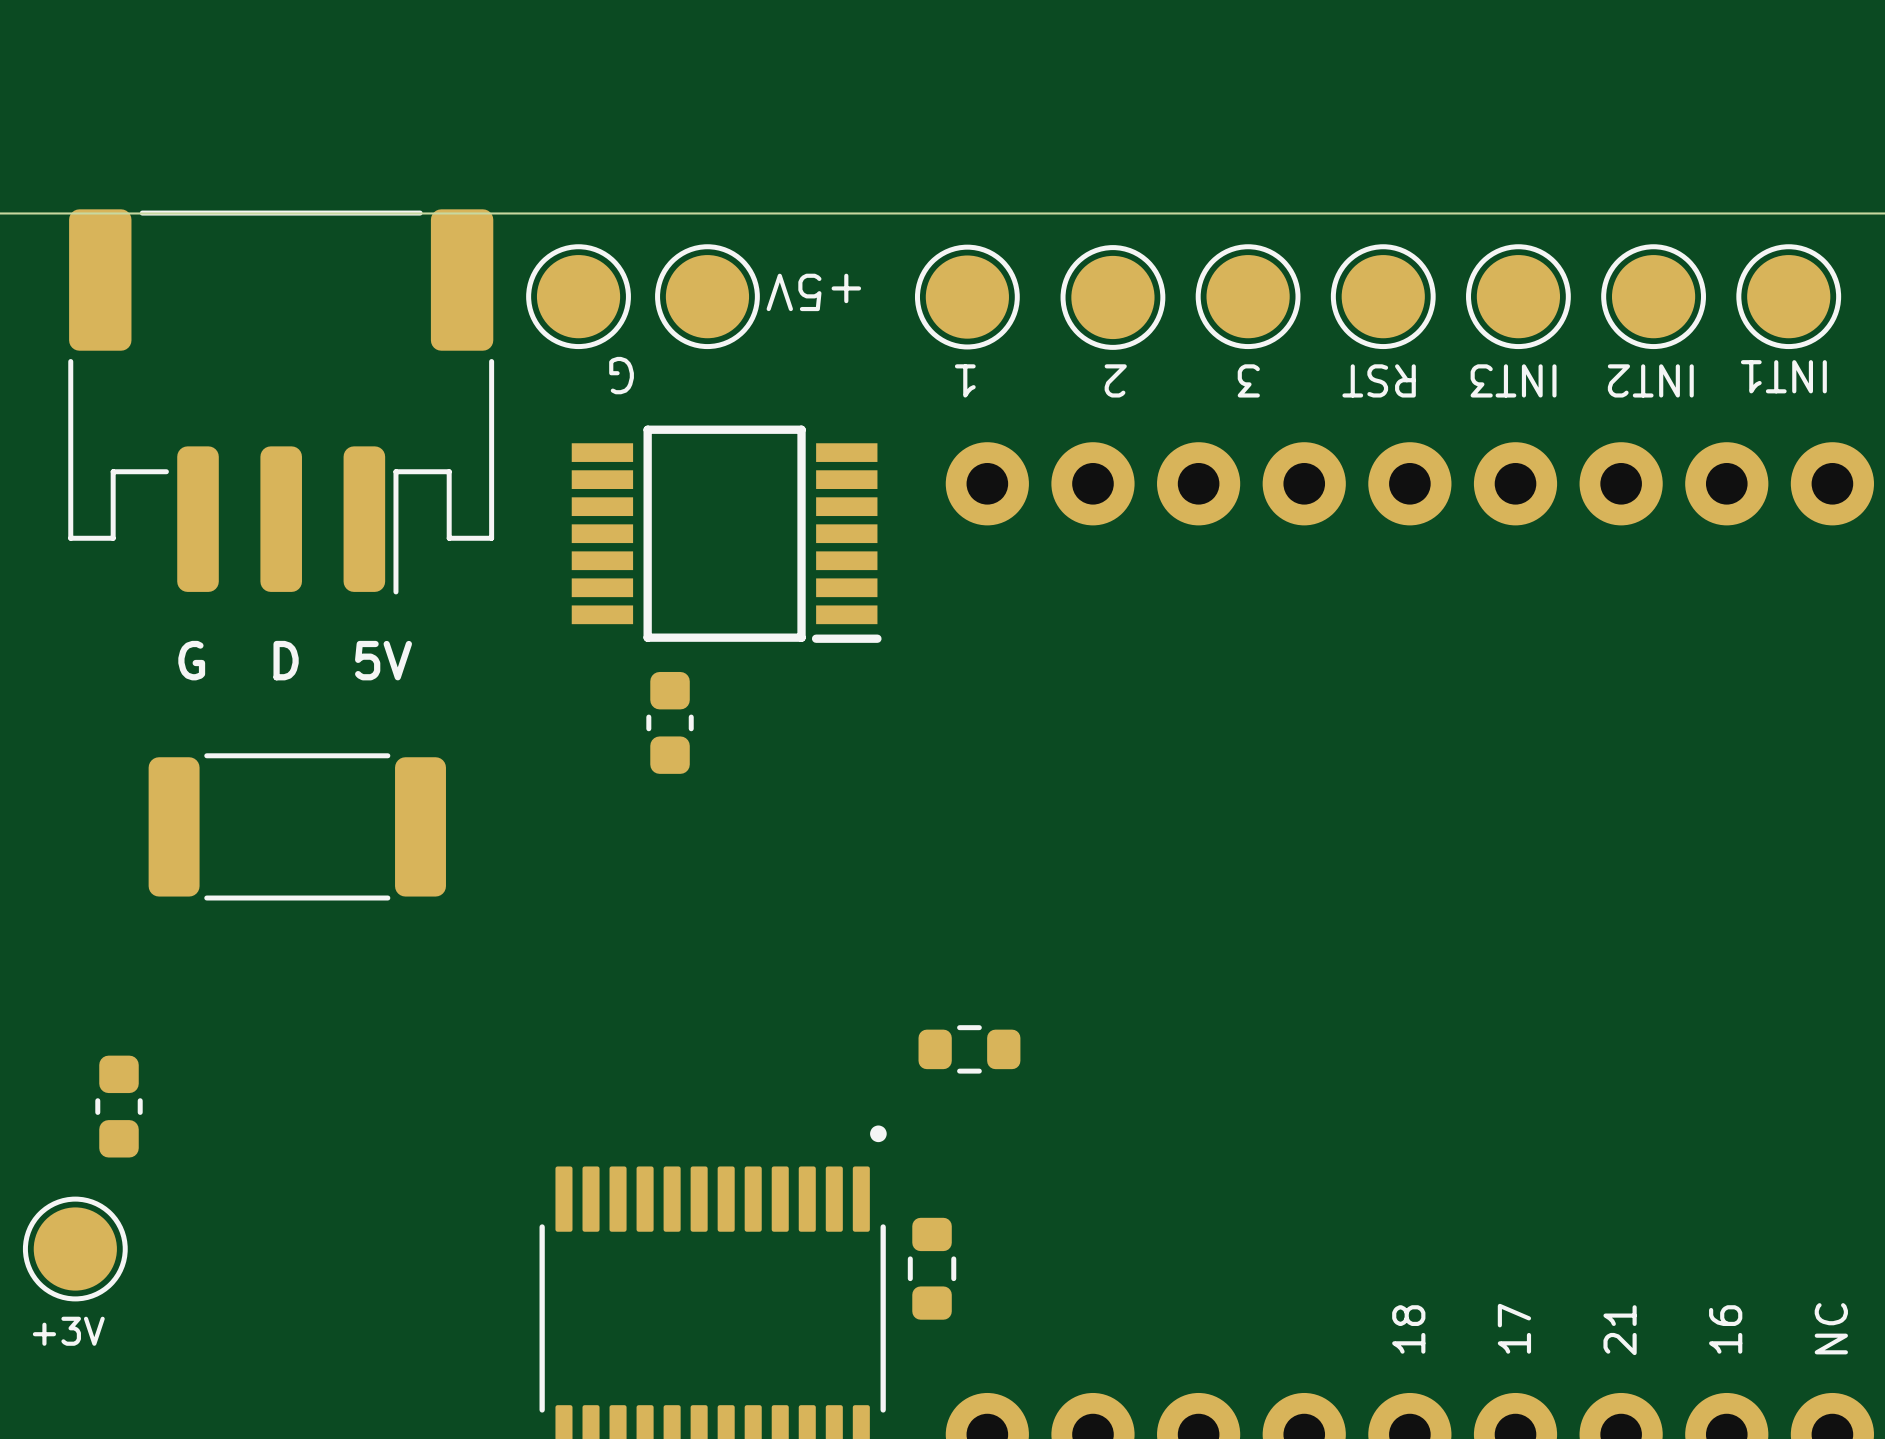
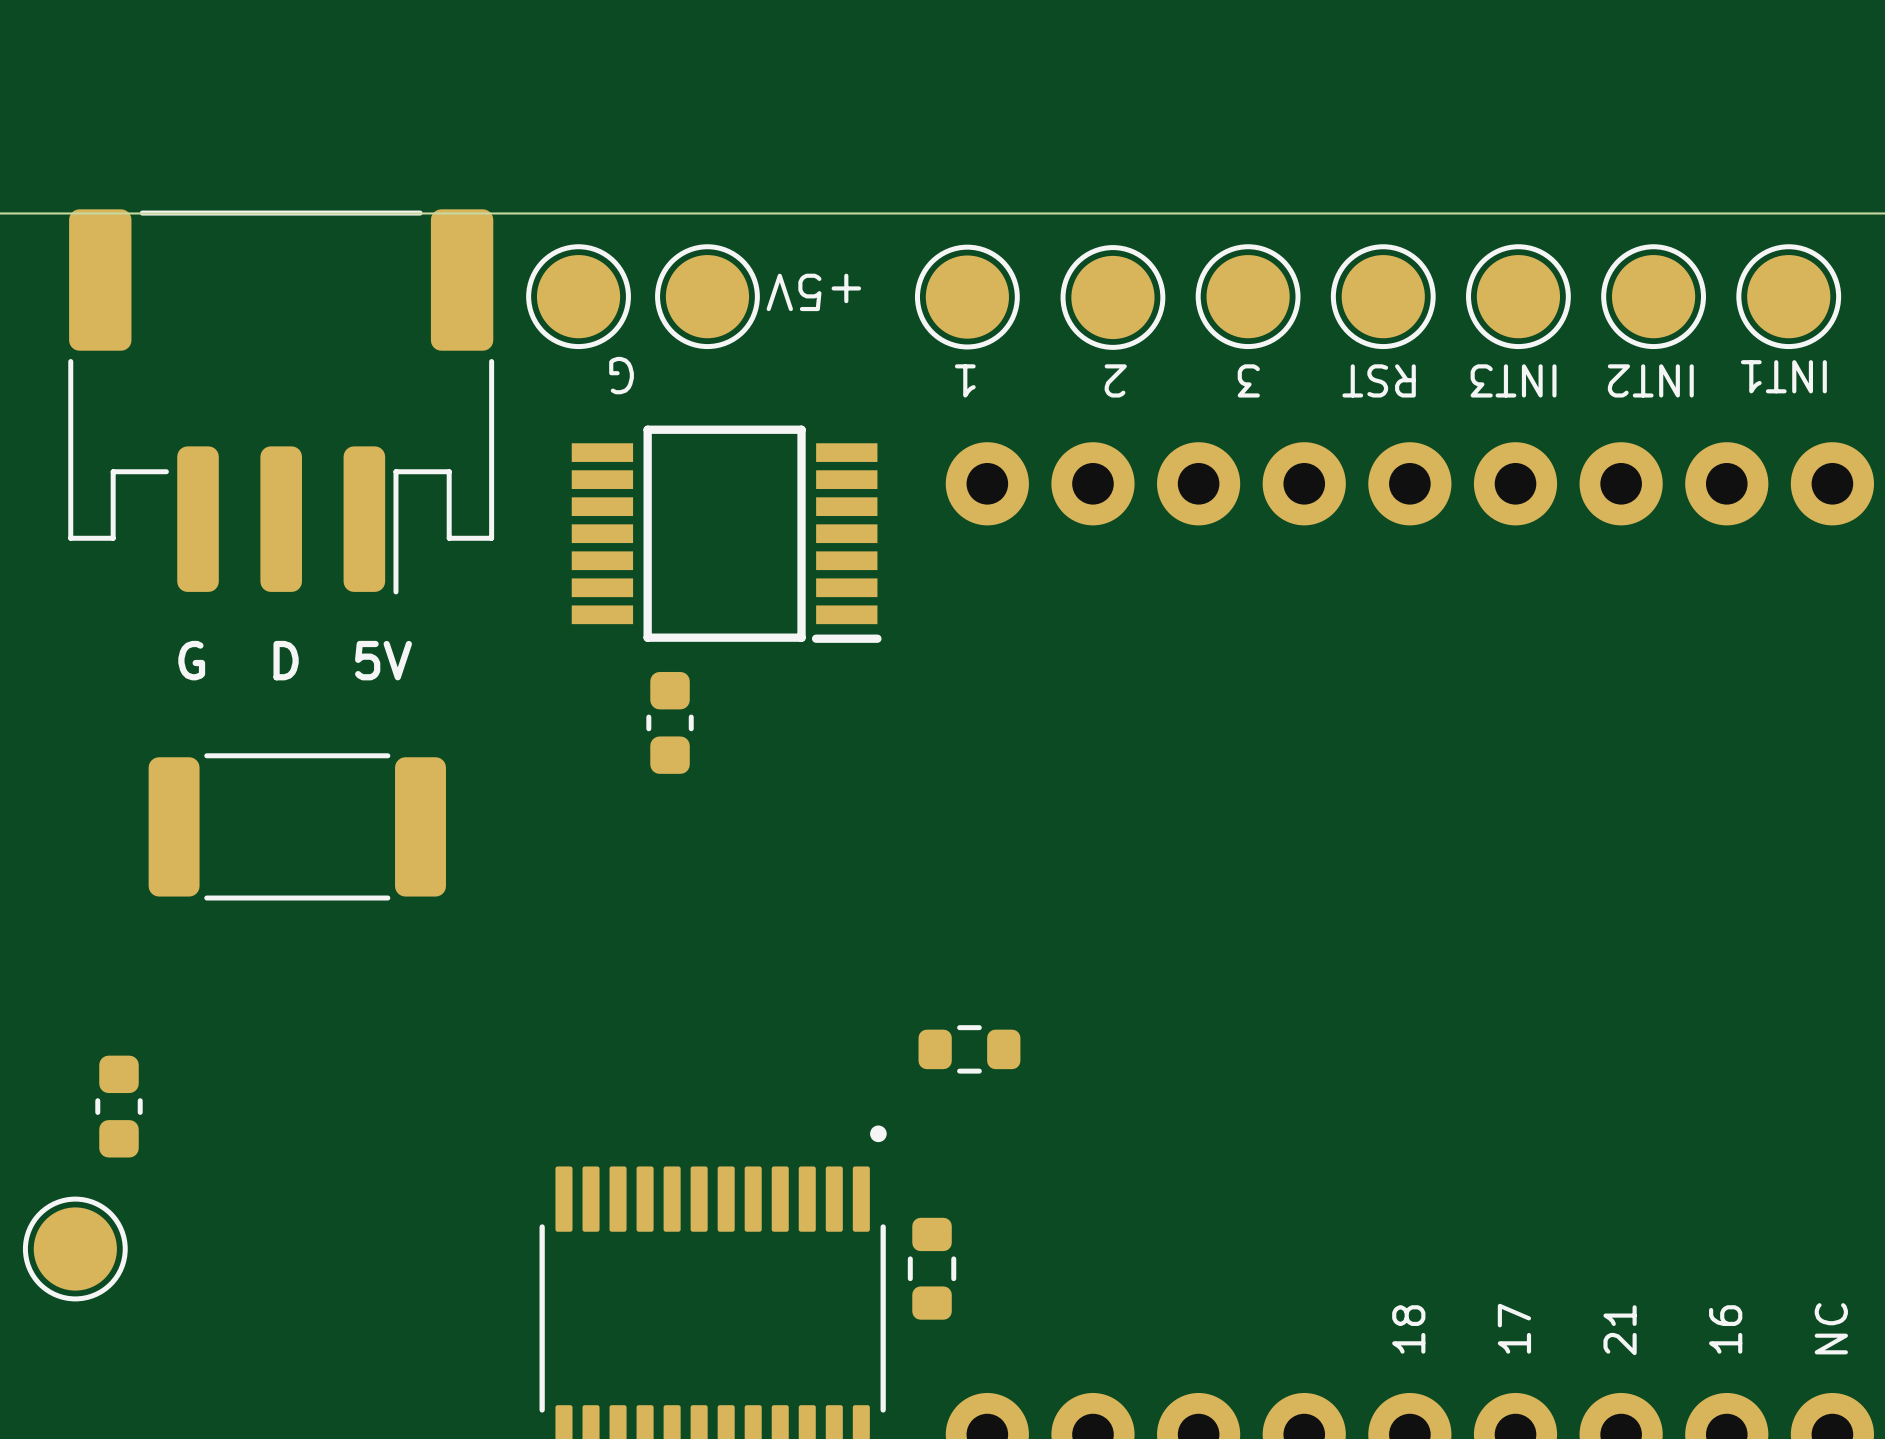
part text: +3V (68, 1331) -> none

